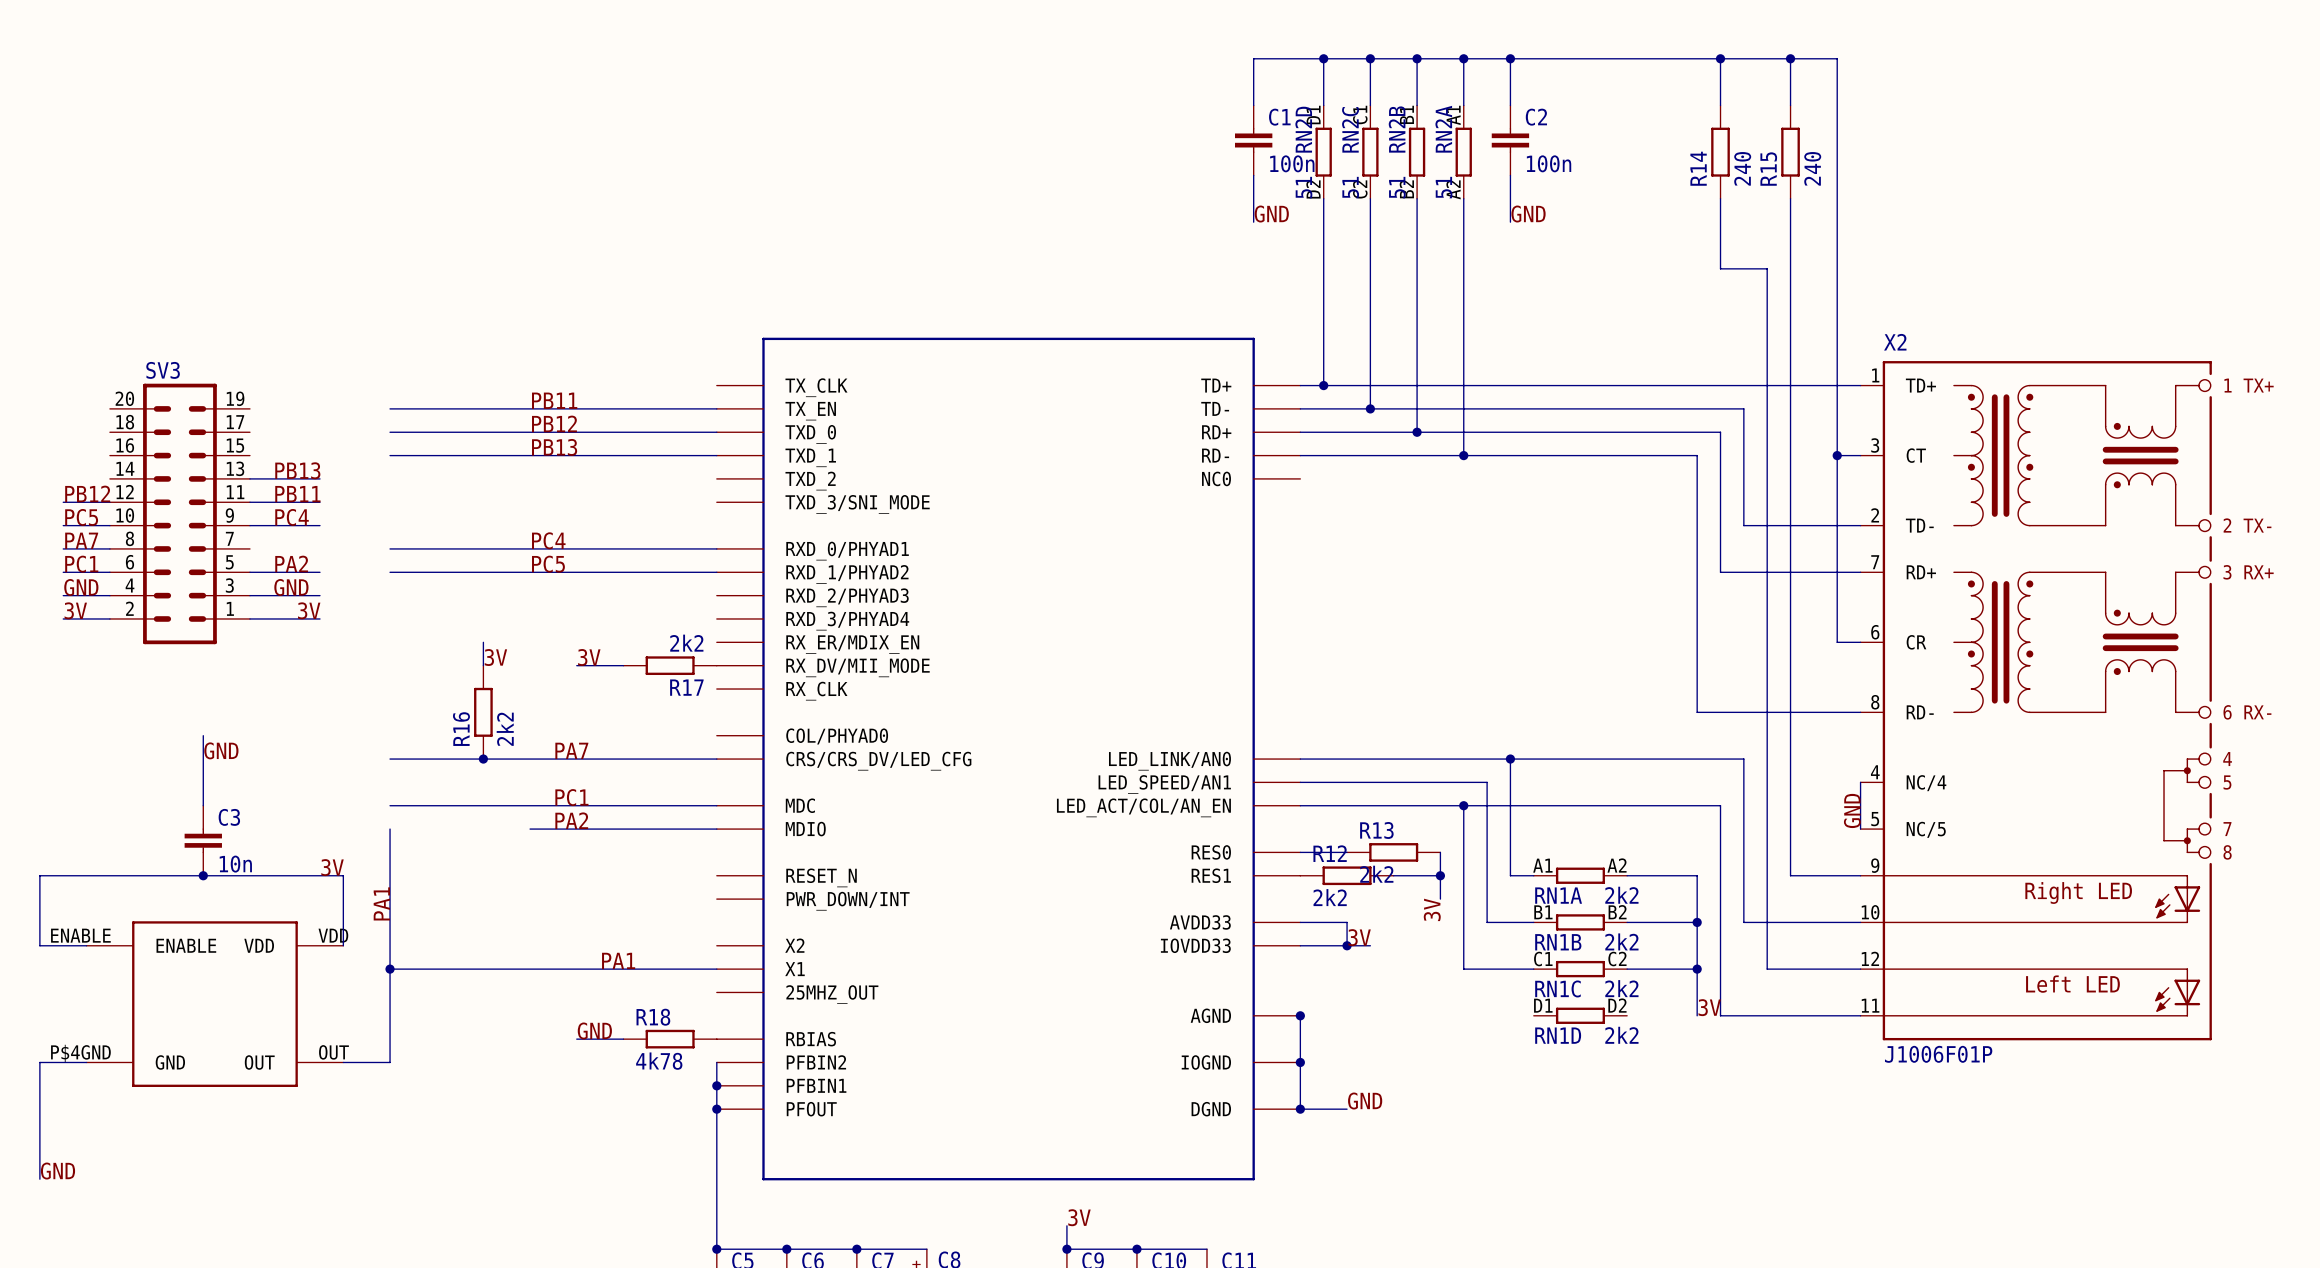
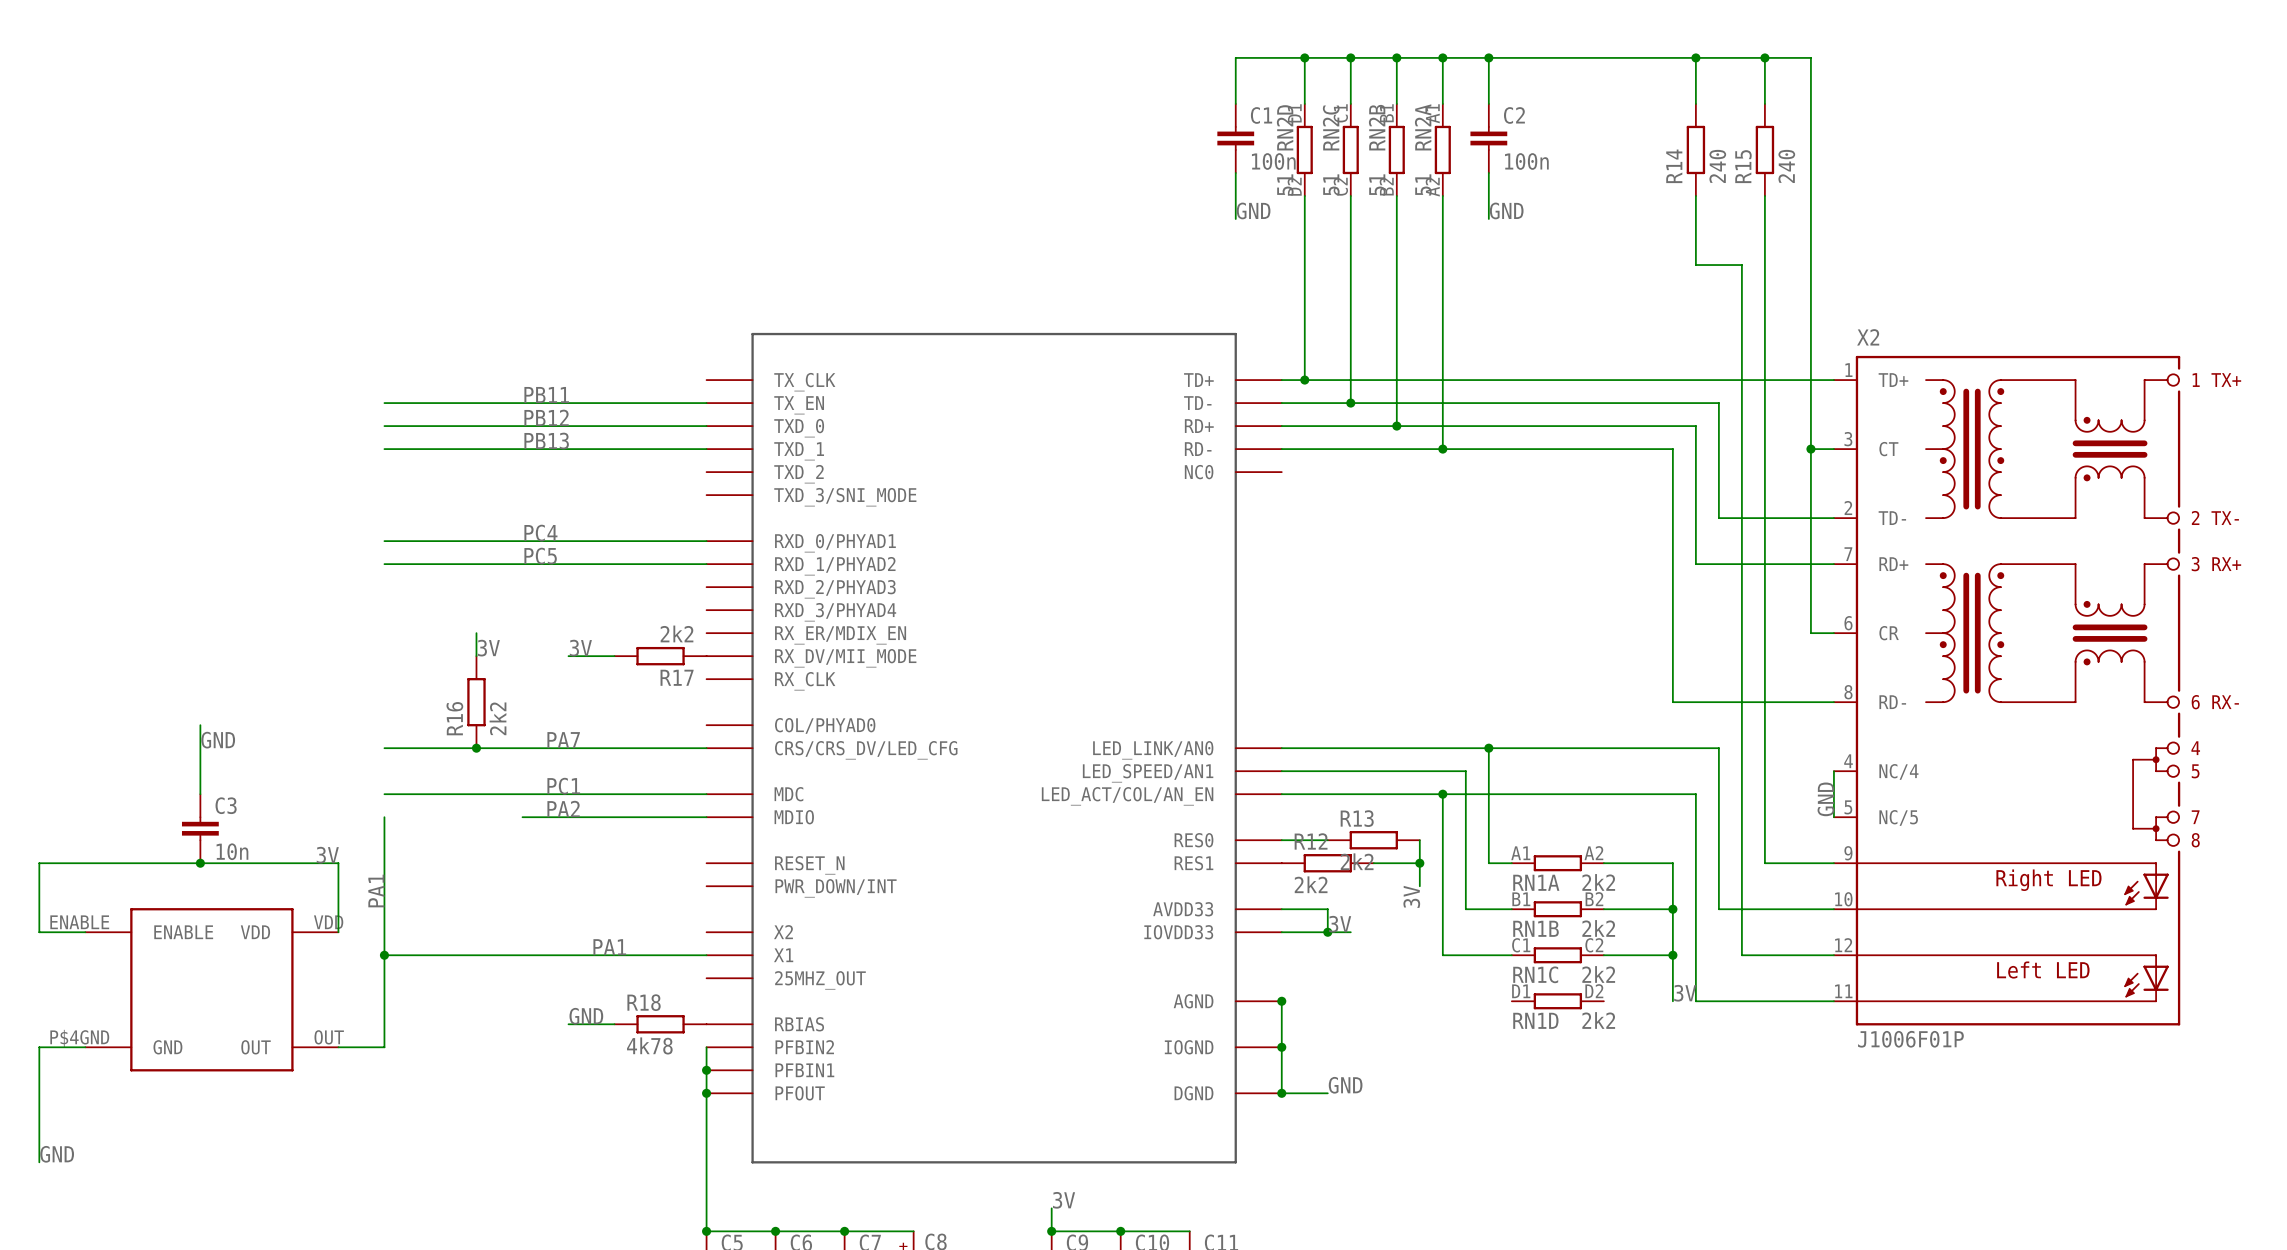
label: PB13 (297, 470) -> none
wire: (249, 478) (320, 478) -> none
label: PB12 (87, 493) -> none
label: PB11 (297, 494) -> none
wire: (63, 502) (109, 502) -> none
wire: (249, 502) (320, 502) -> none
SV3: (179, 513) -> none
label: PC5 (81, 517) -> none
label: PC4 (292, 517) -> none
wire: (63, 525) (109, 525) -> none
wire: (249, 525) (320, 525) -> none
label: PA7 (81, 540) -> none
wire: (63, 548) (109, 548) -> none
label: PA2 (291, 563) -> none
label: PC1 (81, 564) -> none
wire: (63, 572) (109, 572) -> none
wire: (249, 572) (320, 572) -> none
label: GND (81, 587) -> none
label: GND (291, 587) -> none
wire: (63, 595) (109, 595) -> none
wire: (249, 595) (320, 595) -> none
label: 3V (75, 610) -> none
label: 3V (309, 610) -> none
wire: (63, 618) (109, 618) -> none
wire: (249, 618) (320, 618) -> none

